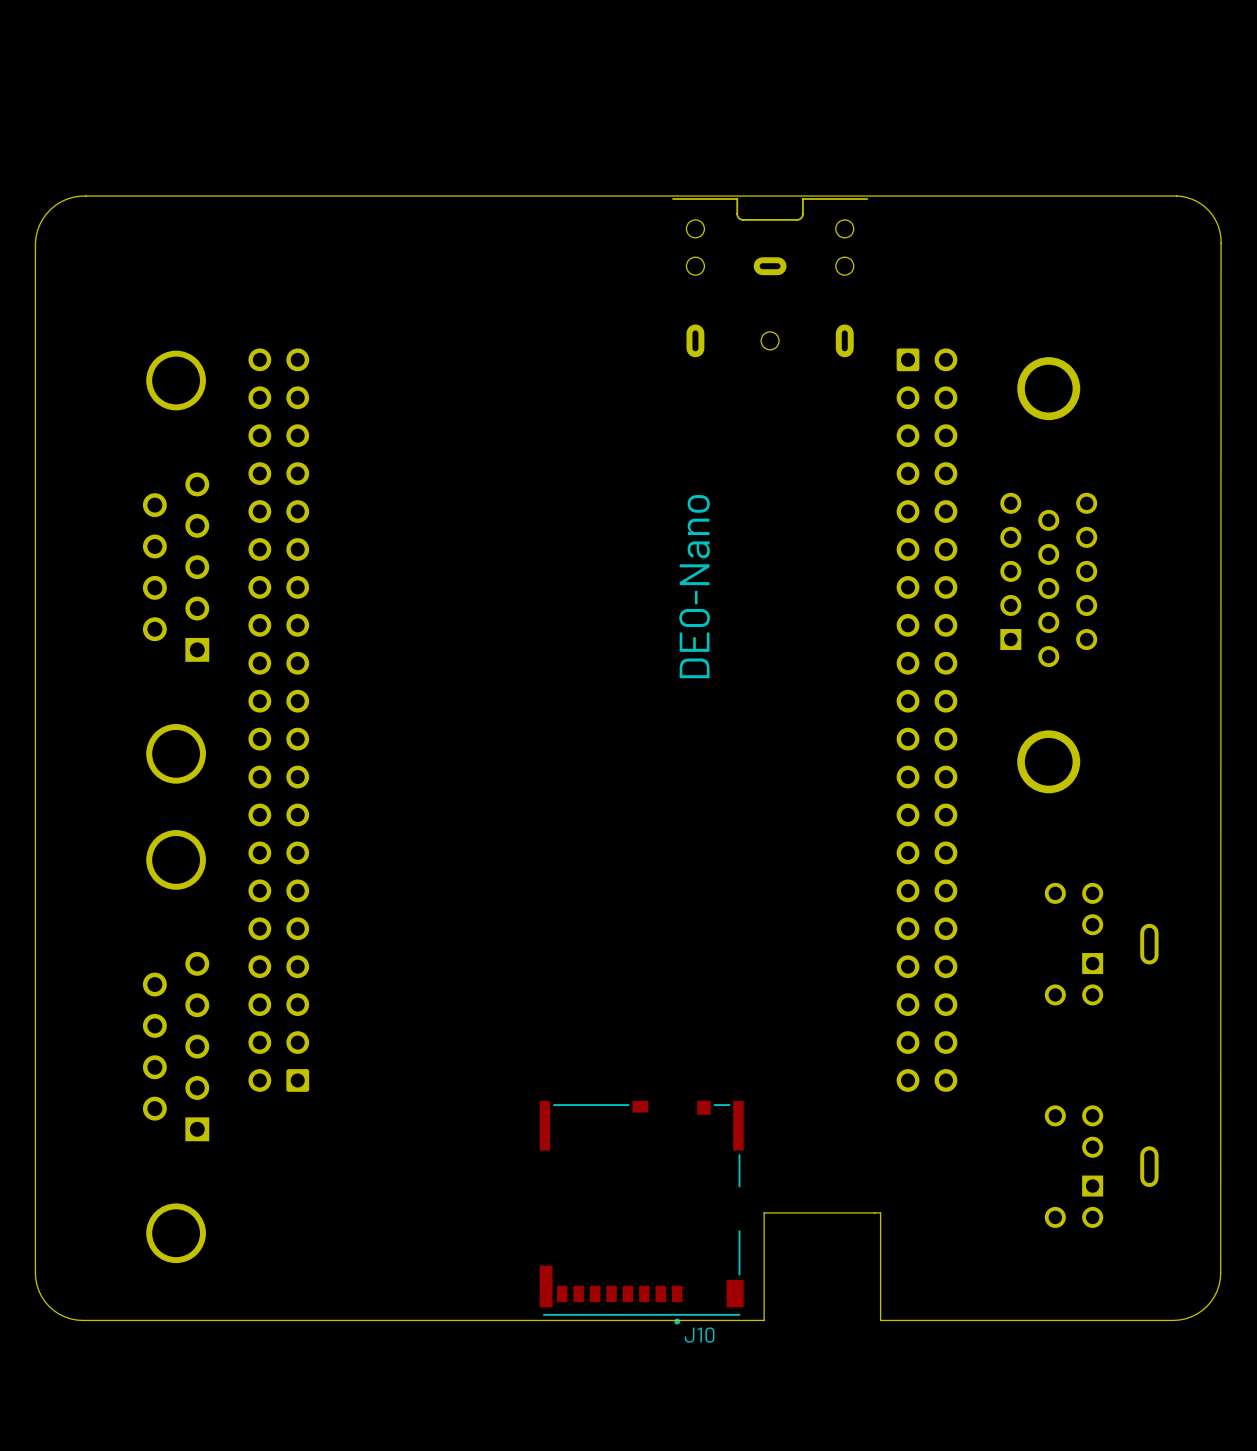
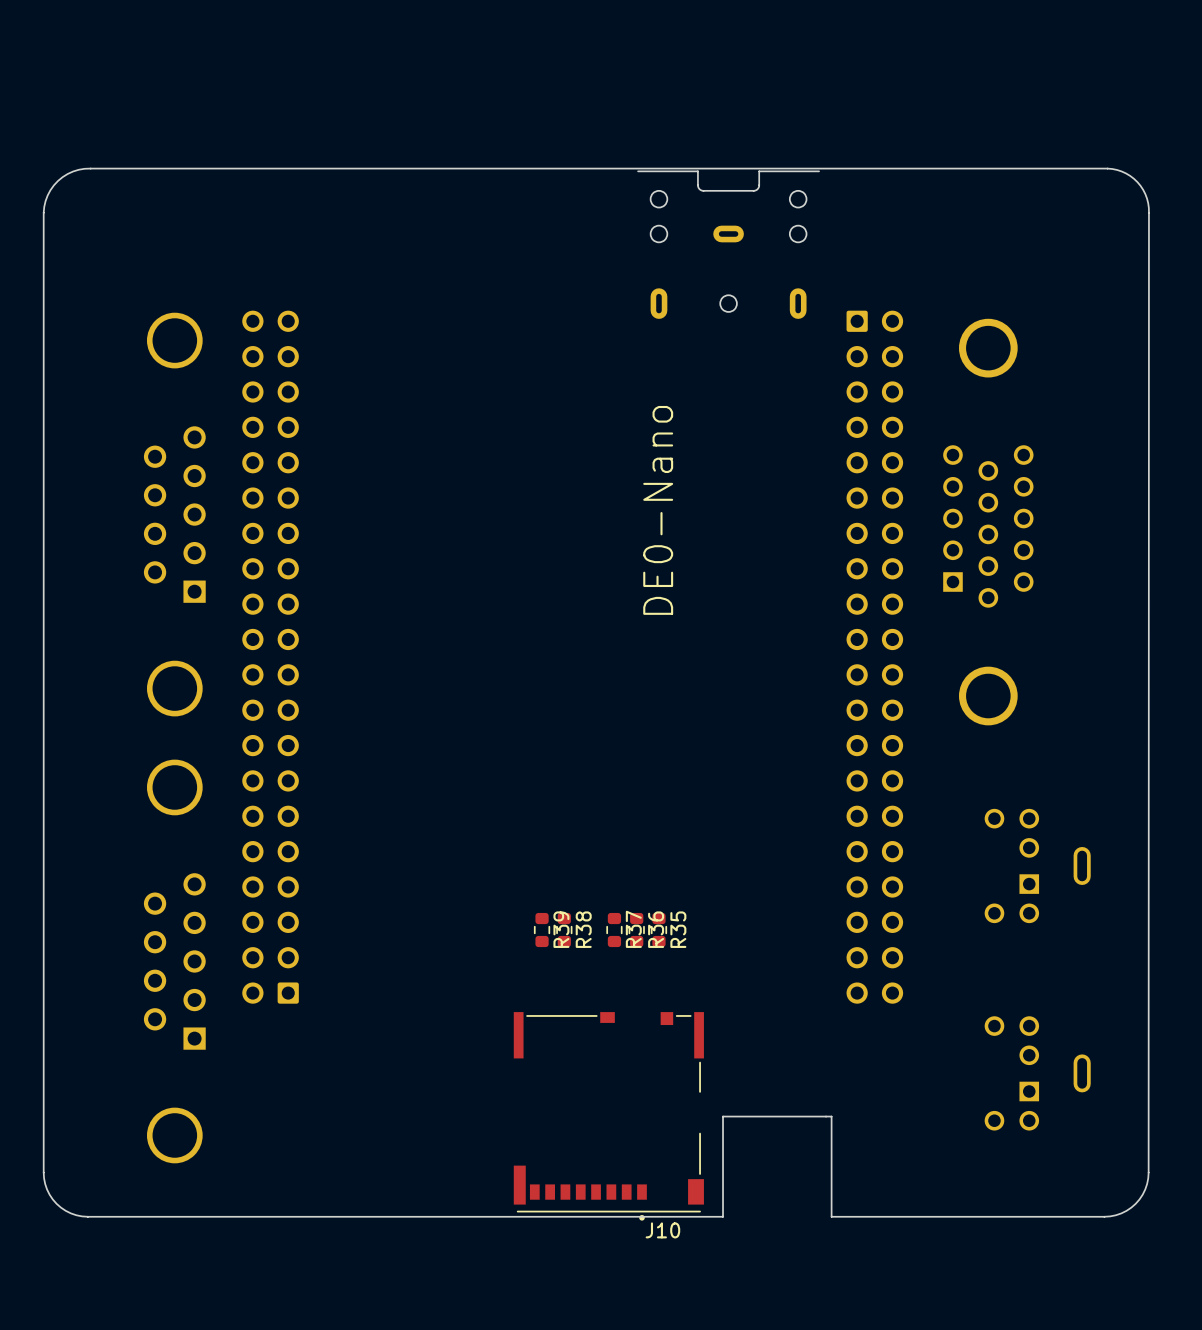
R39: none -> (542, 930)
R38: none -> (564, 930)
R37: none -> (614, 930)
R36: none -> (636, 930)
R35: none -> (658, 930)

